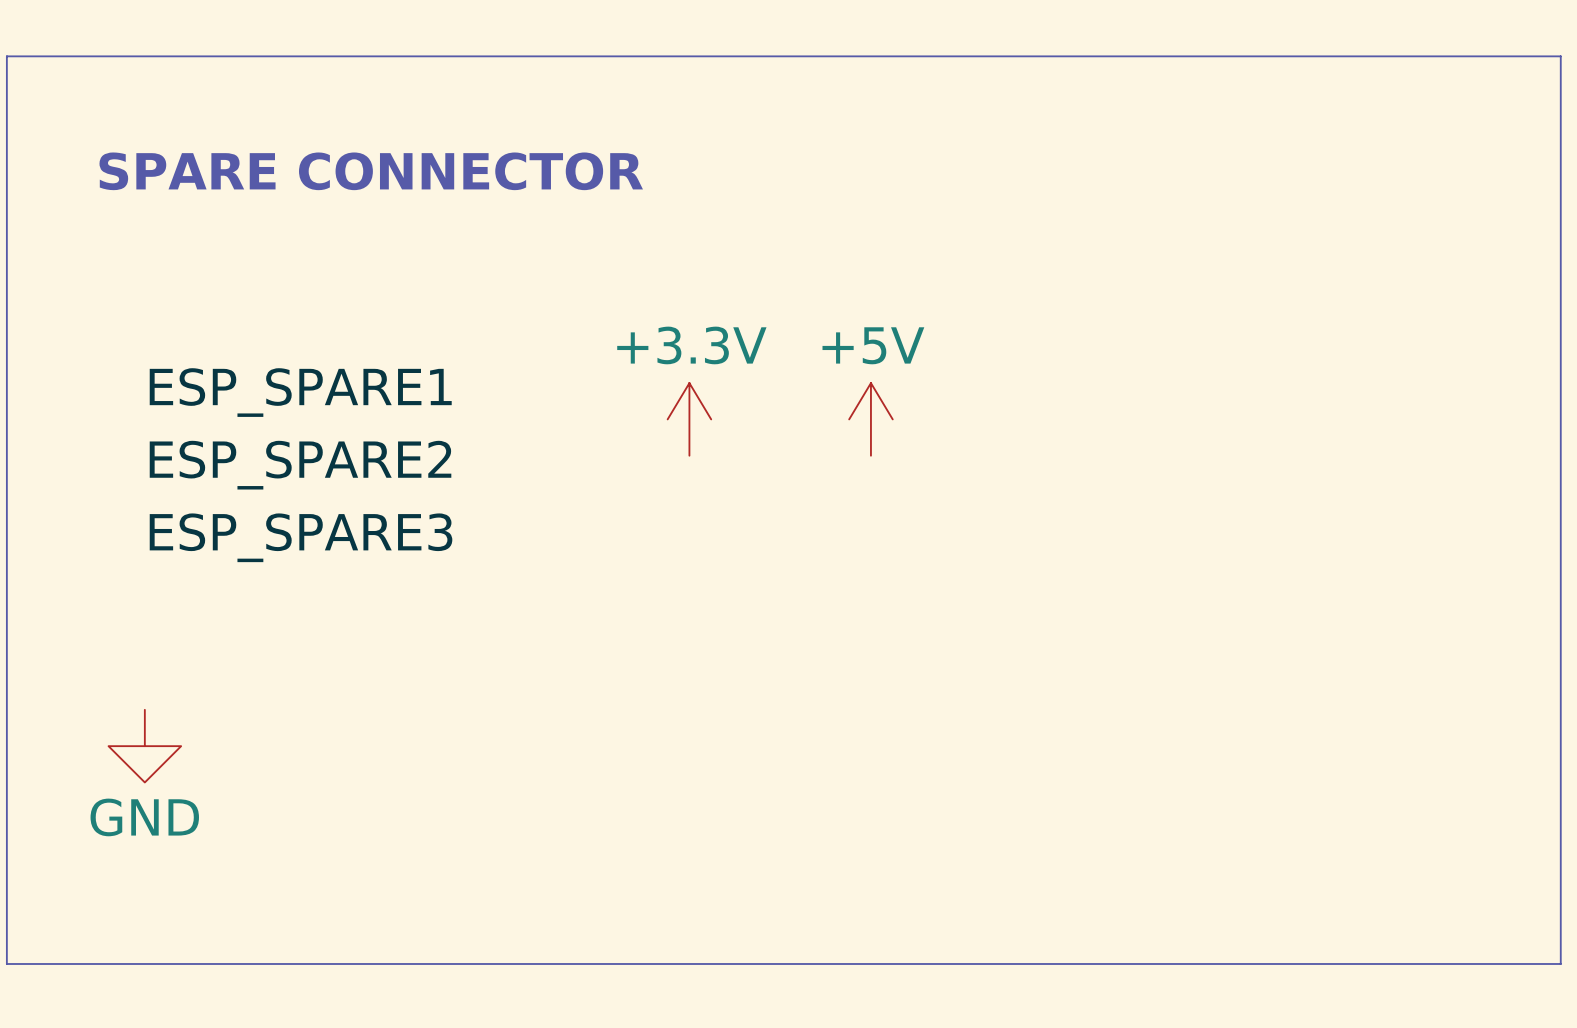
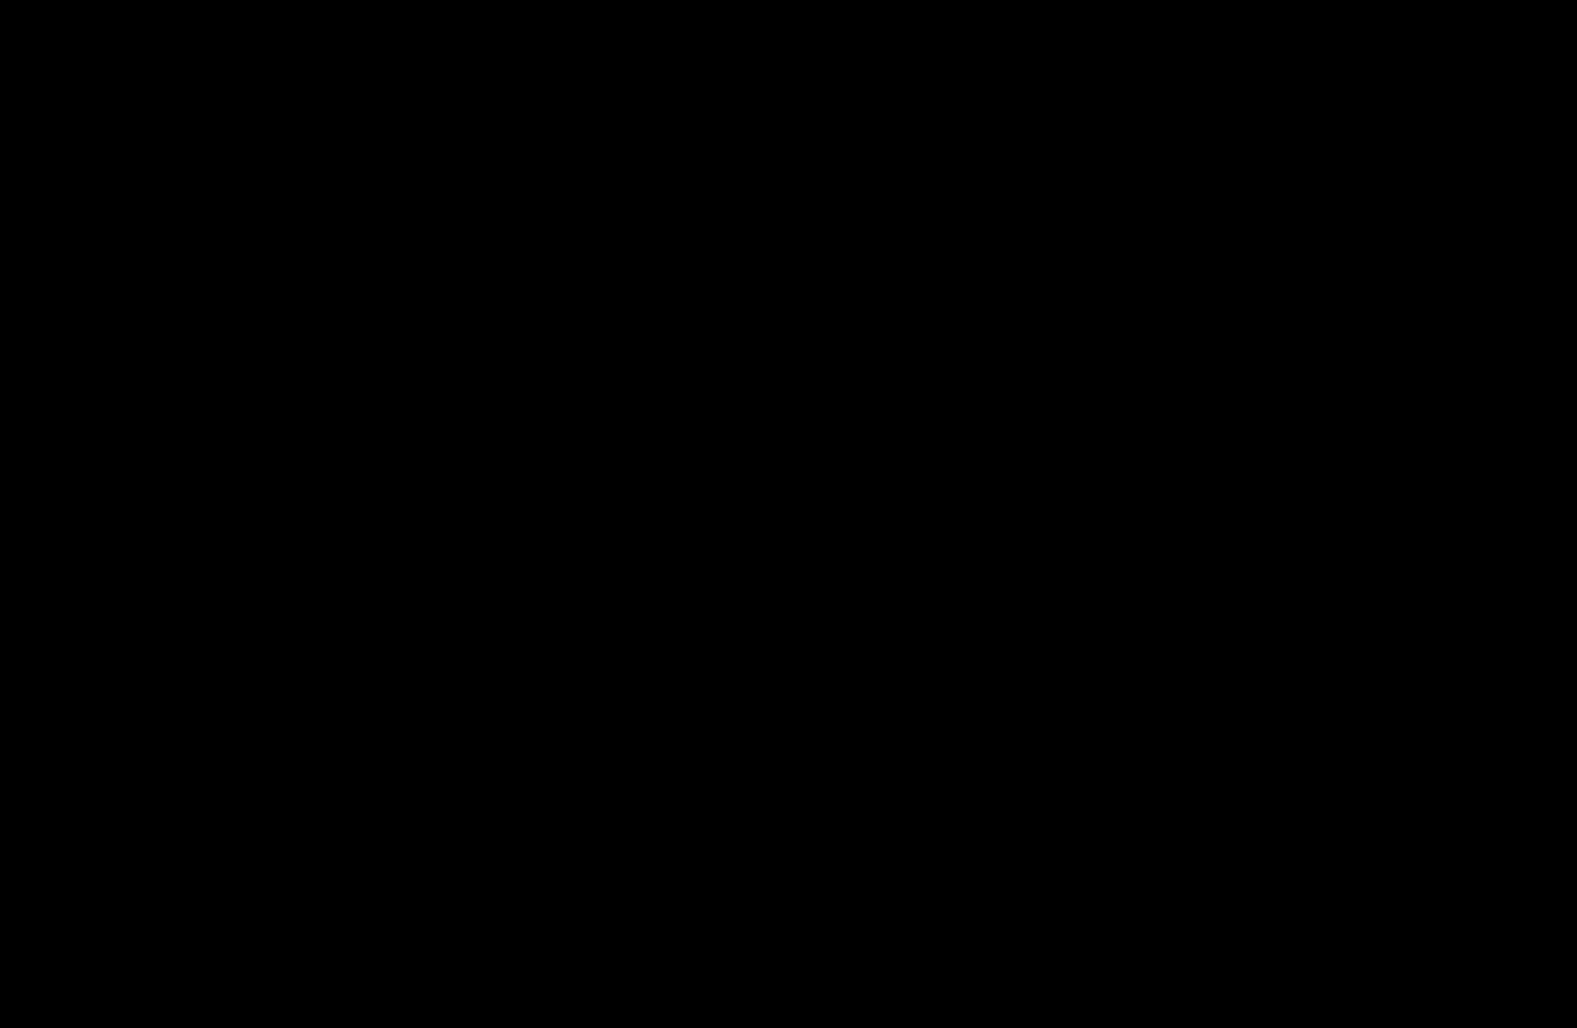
line: (6, 56) (1560, 56) (1560, 963) (6, 963) (6, 56) -> none
text: SPARE CONNECTOR (371, 171) -> none
label: ESP_SPARE1 (300, 392) -> none
power symbol: +3.3V (689, 419) -> none
power symbol: +5V (870, 419) -> none
label: ESP_SPARE2 (300, 465) -> none
label: ESP_SPARE3 (301, 537) -> none
power symbol: GND (144, 746) -> none

